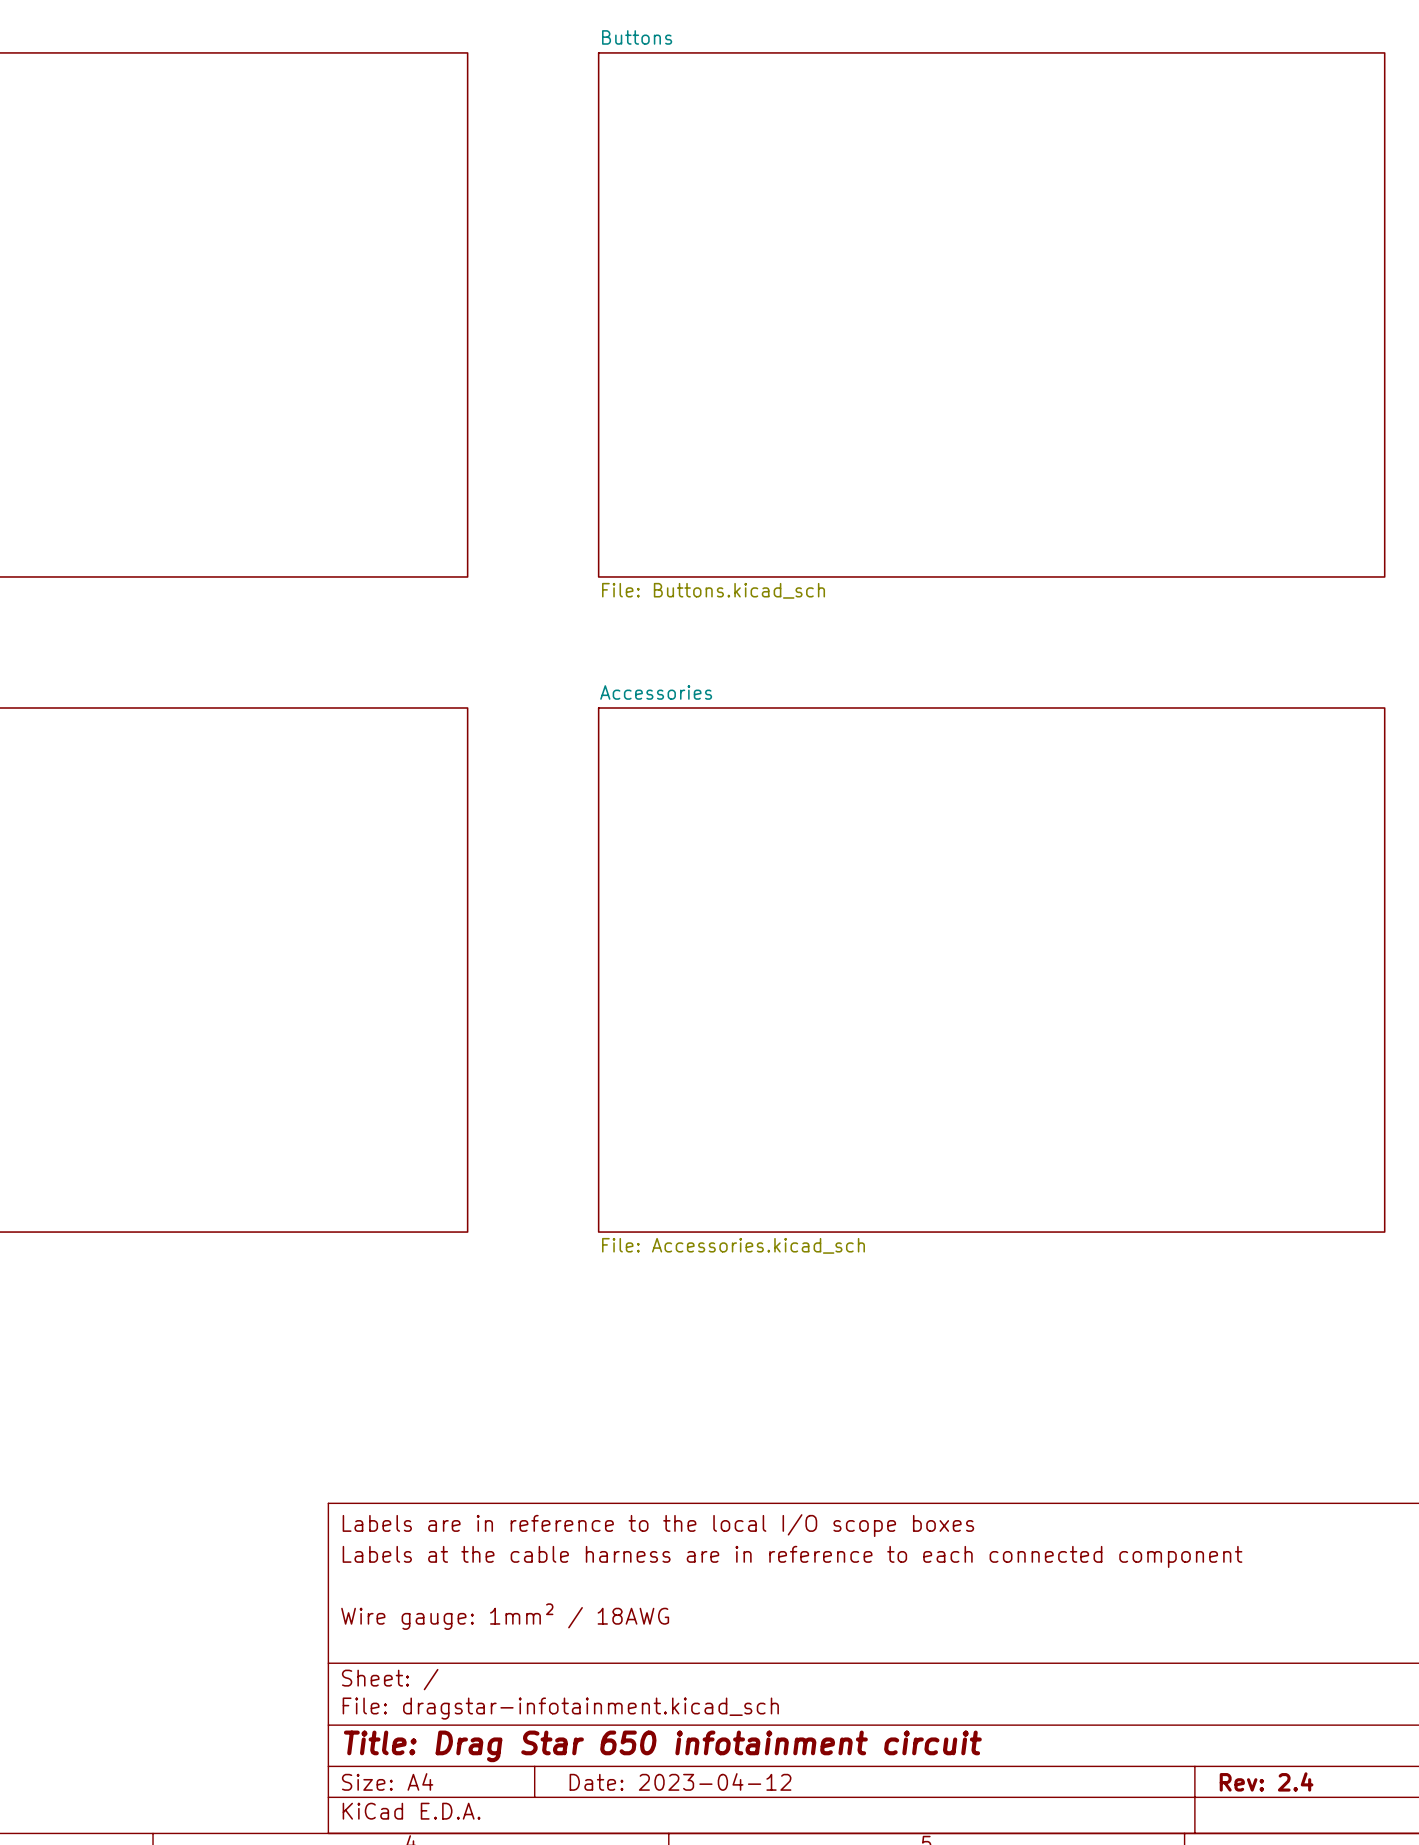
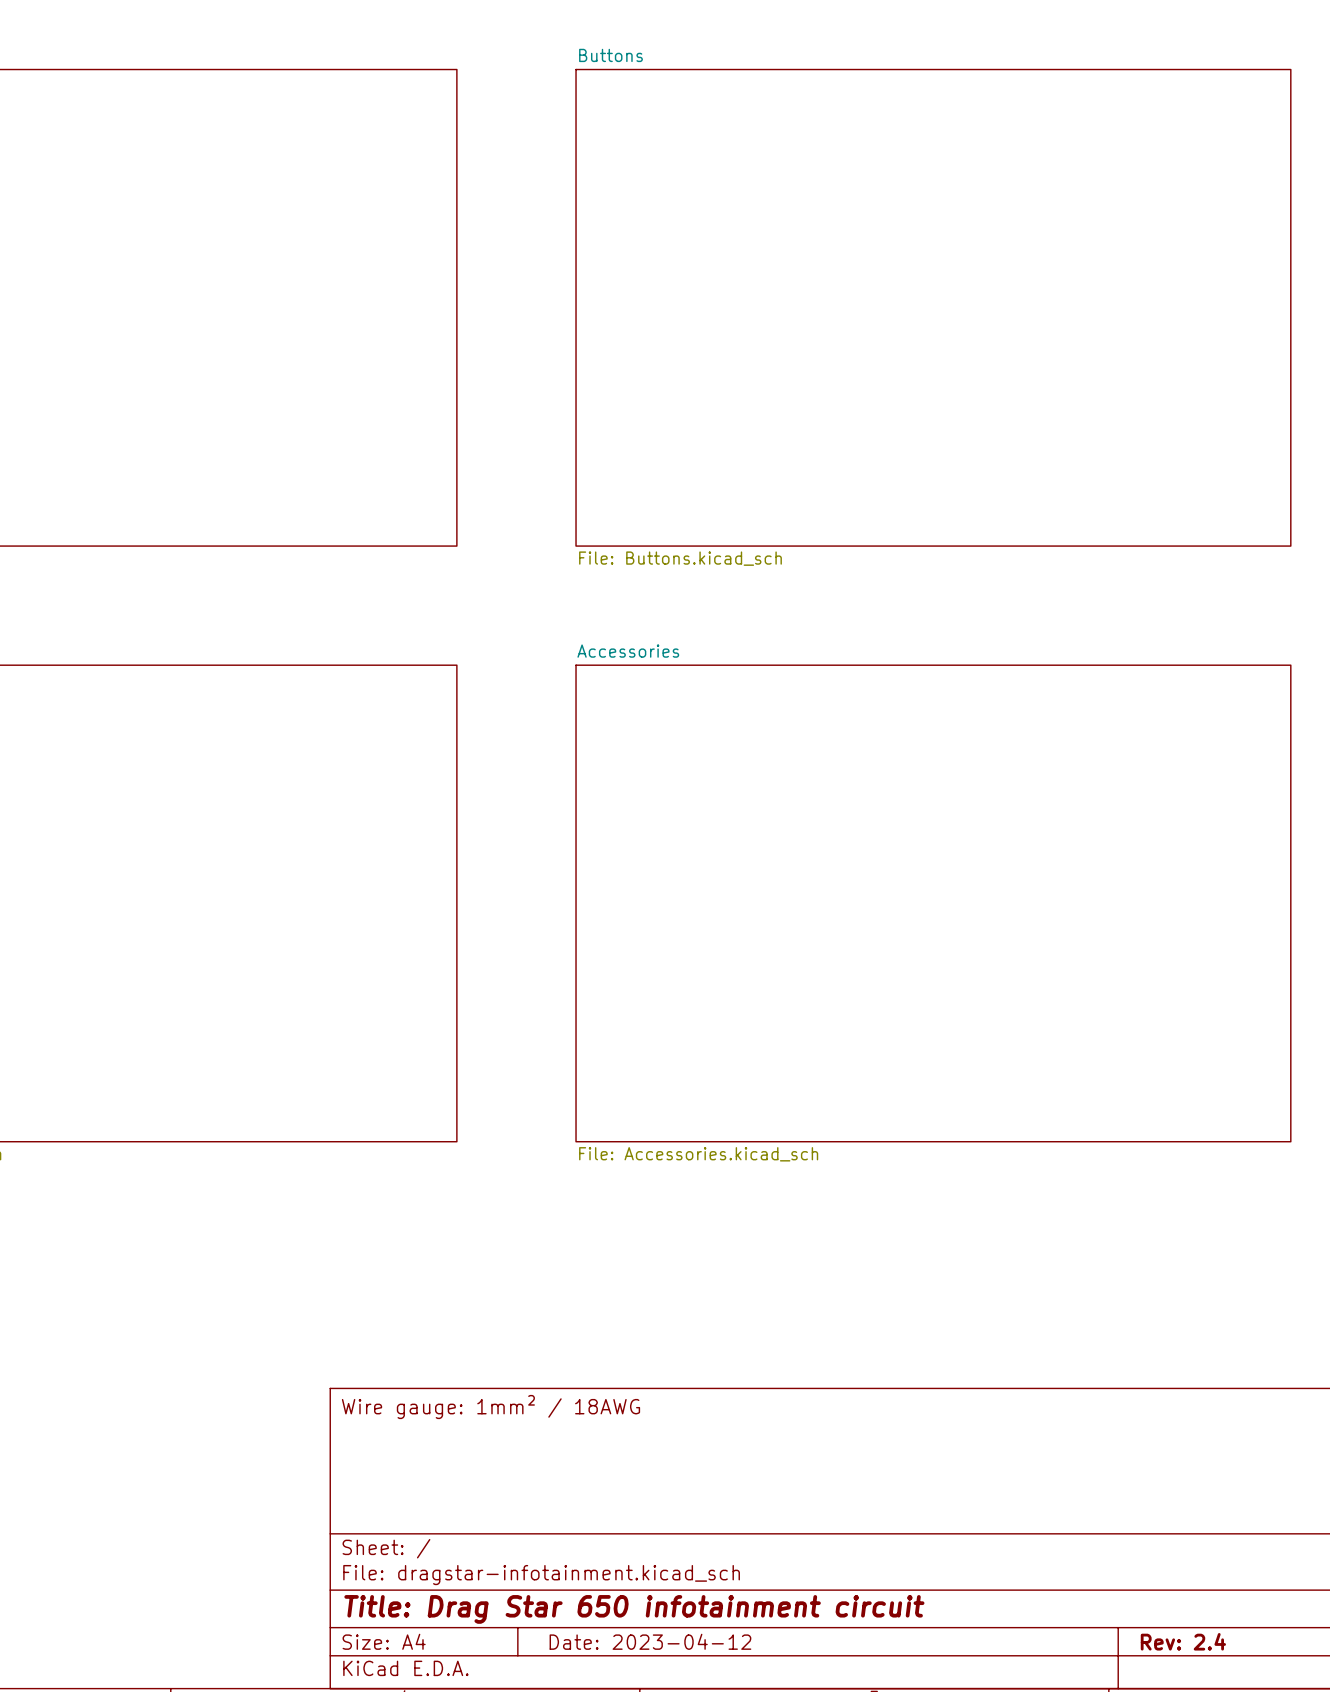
title block: Labels are in reference to the local I/O scope boxes (658, 1525) -> Wire gauge: 1mm² / 18AWG (490, 1407)
title block: Labels at the cable harness are in reference to each connected component (792, 1556) -> none
title block: Wire gauge: 1mm² / 18AWG (505, 1616) -> none

